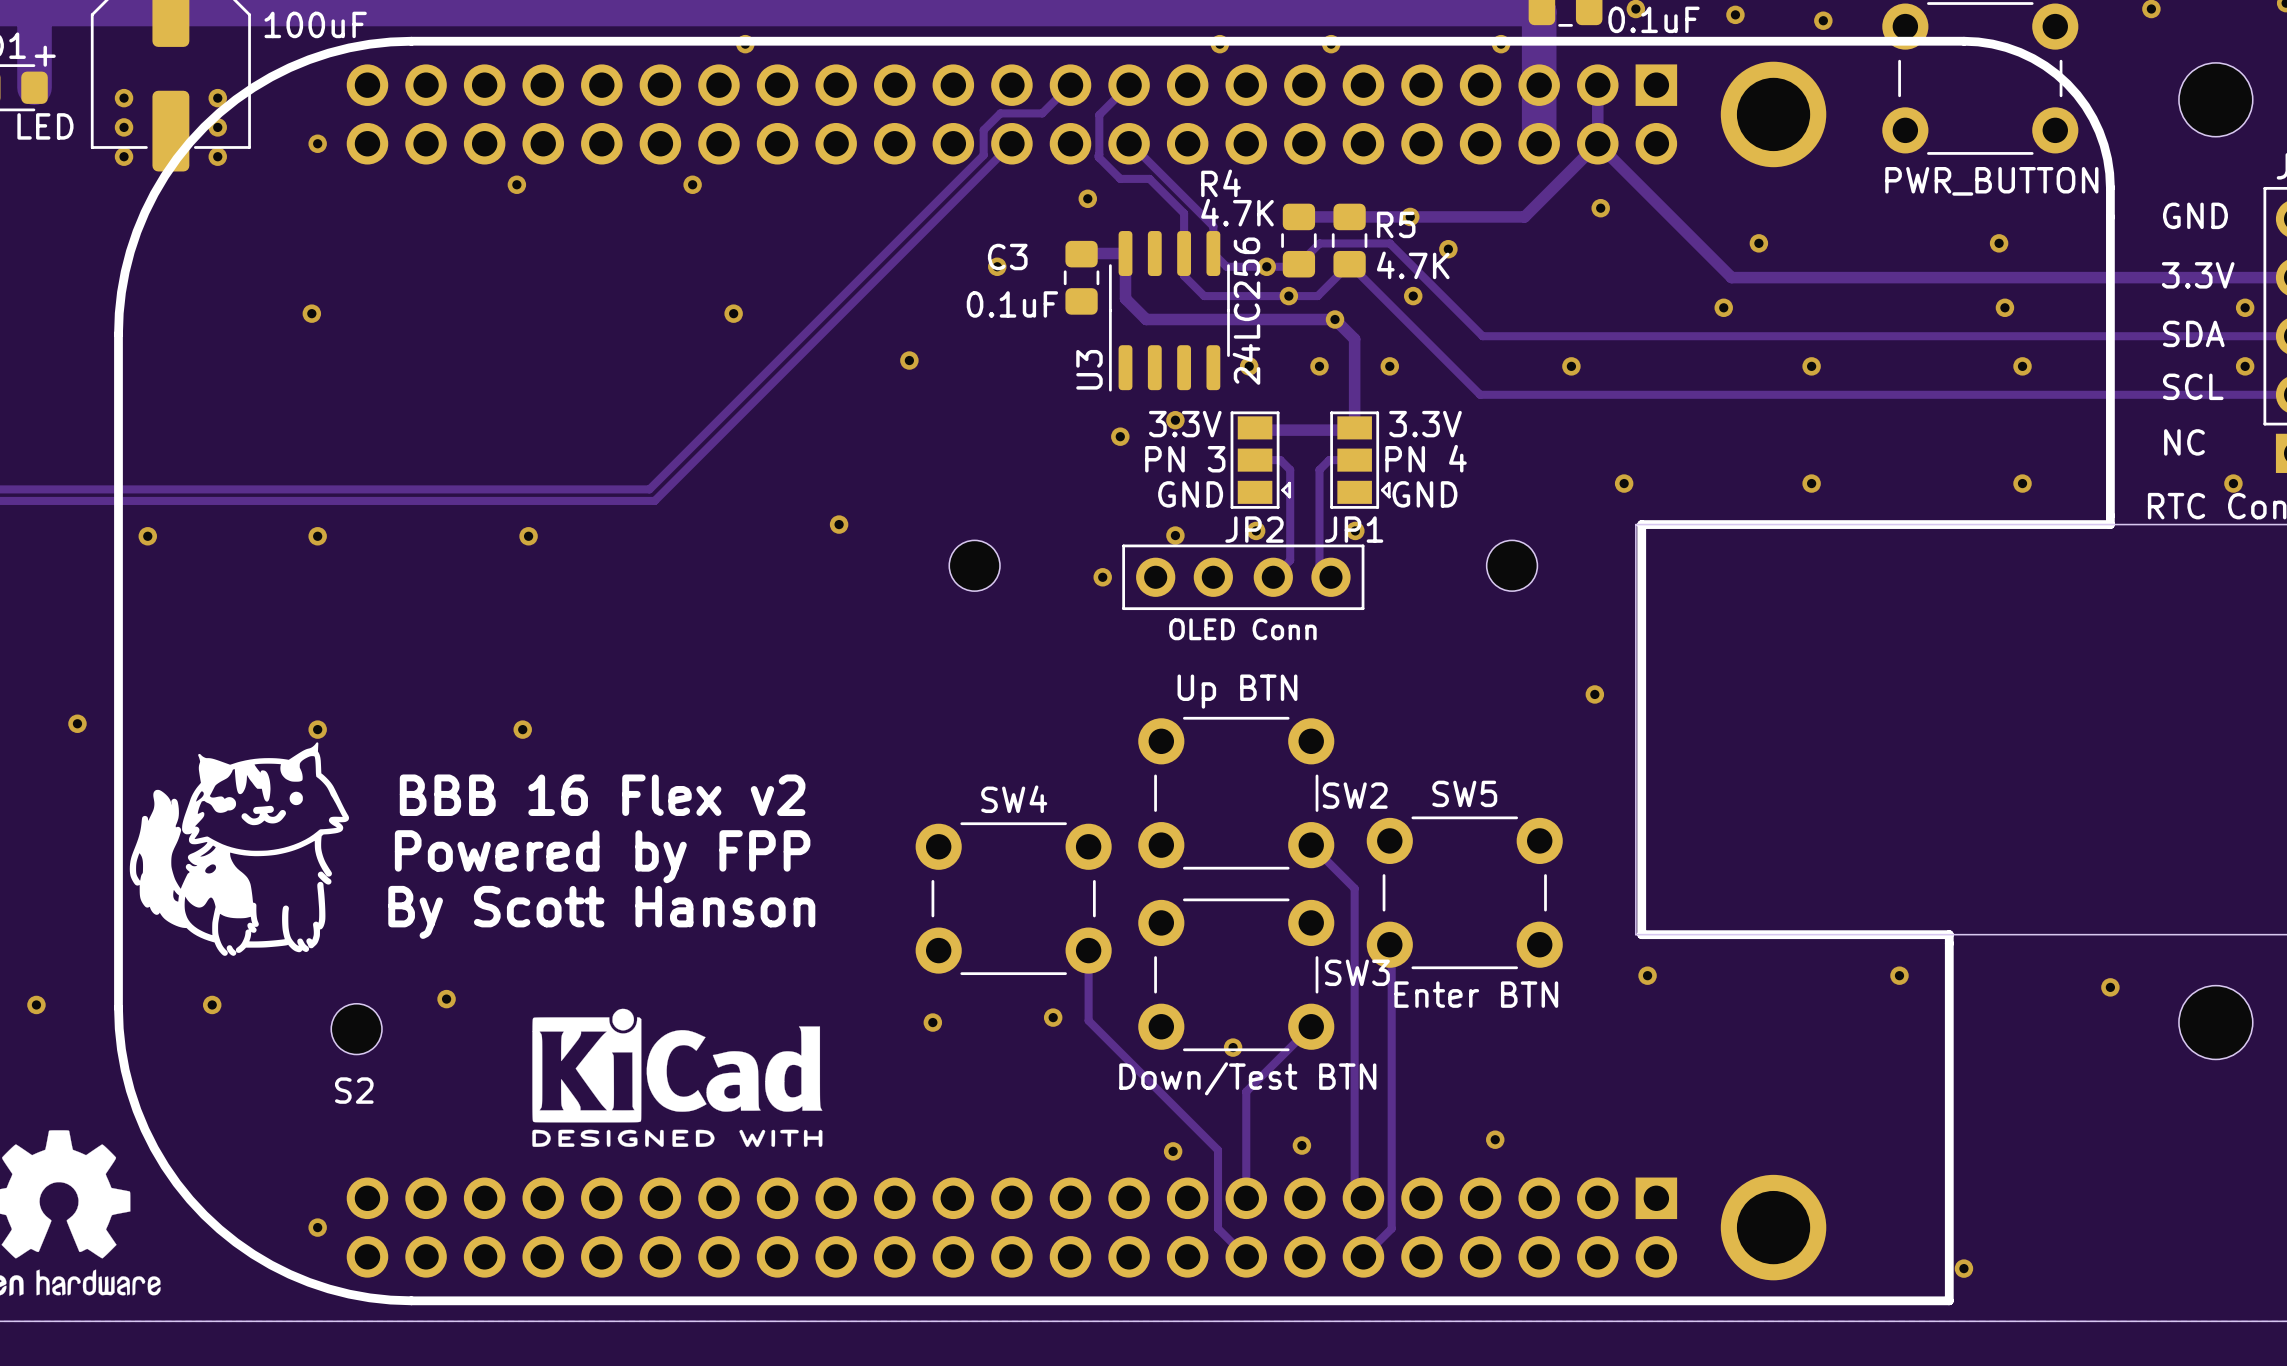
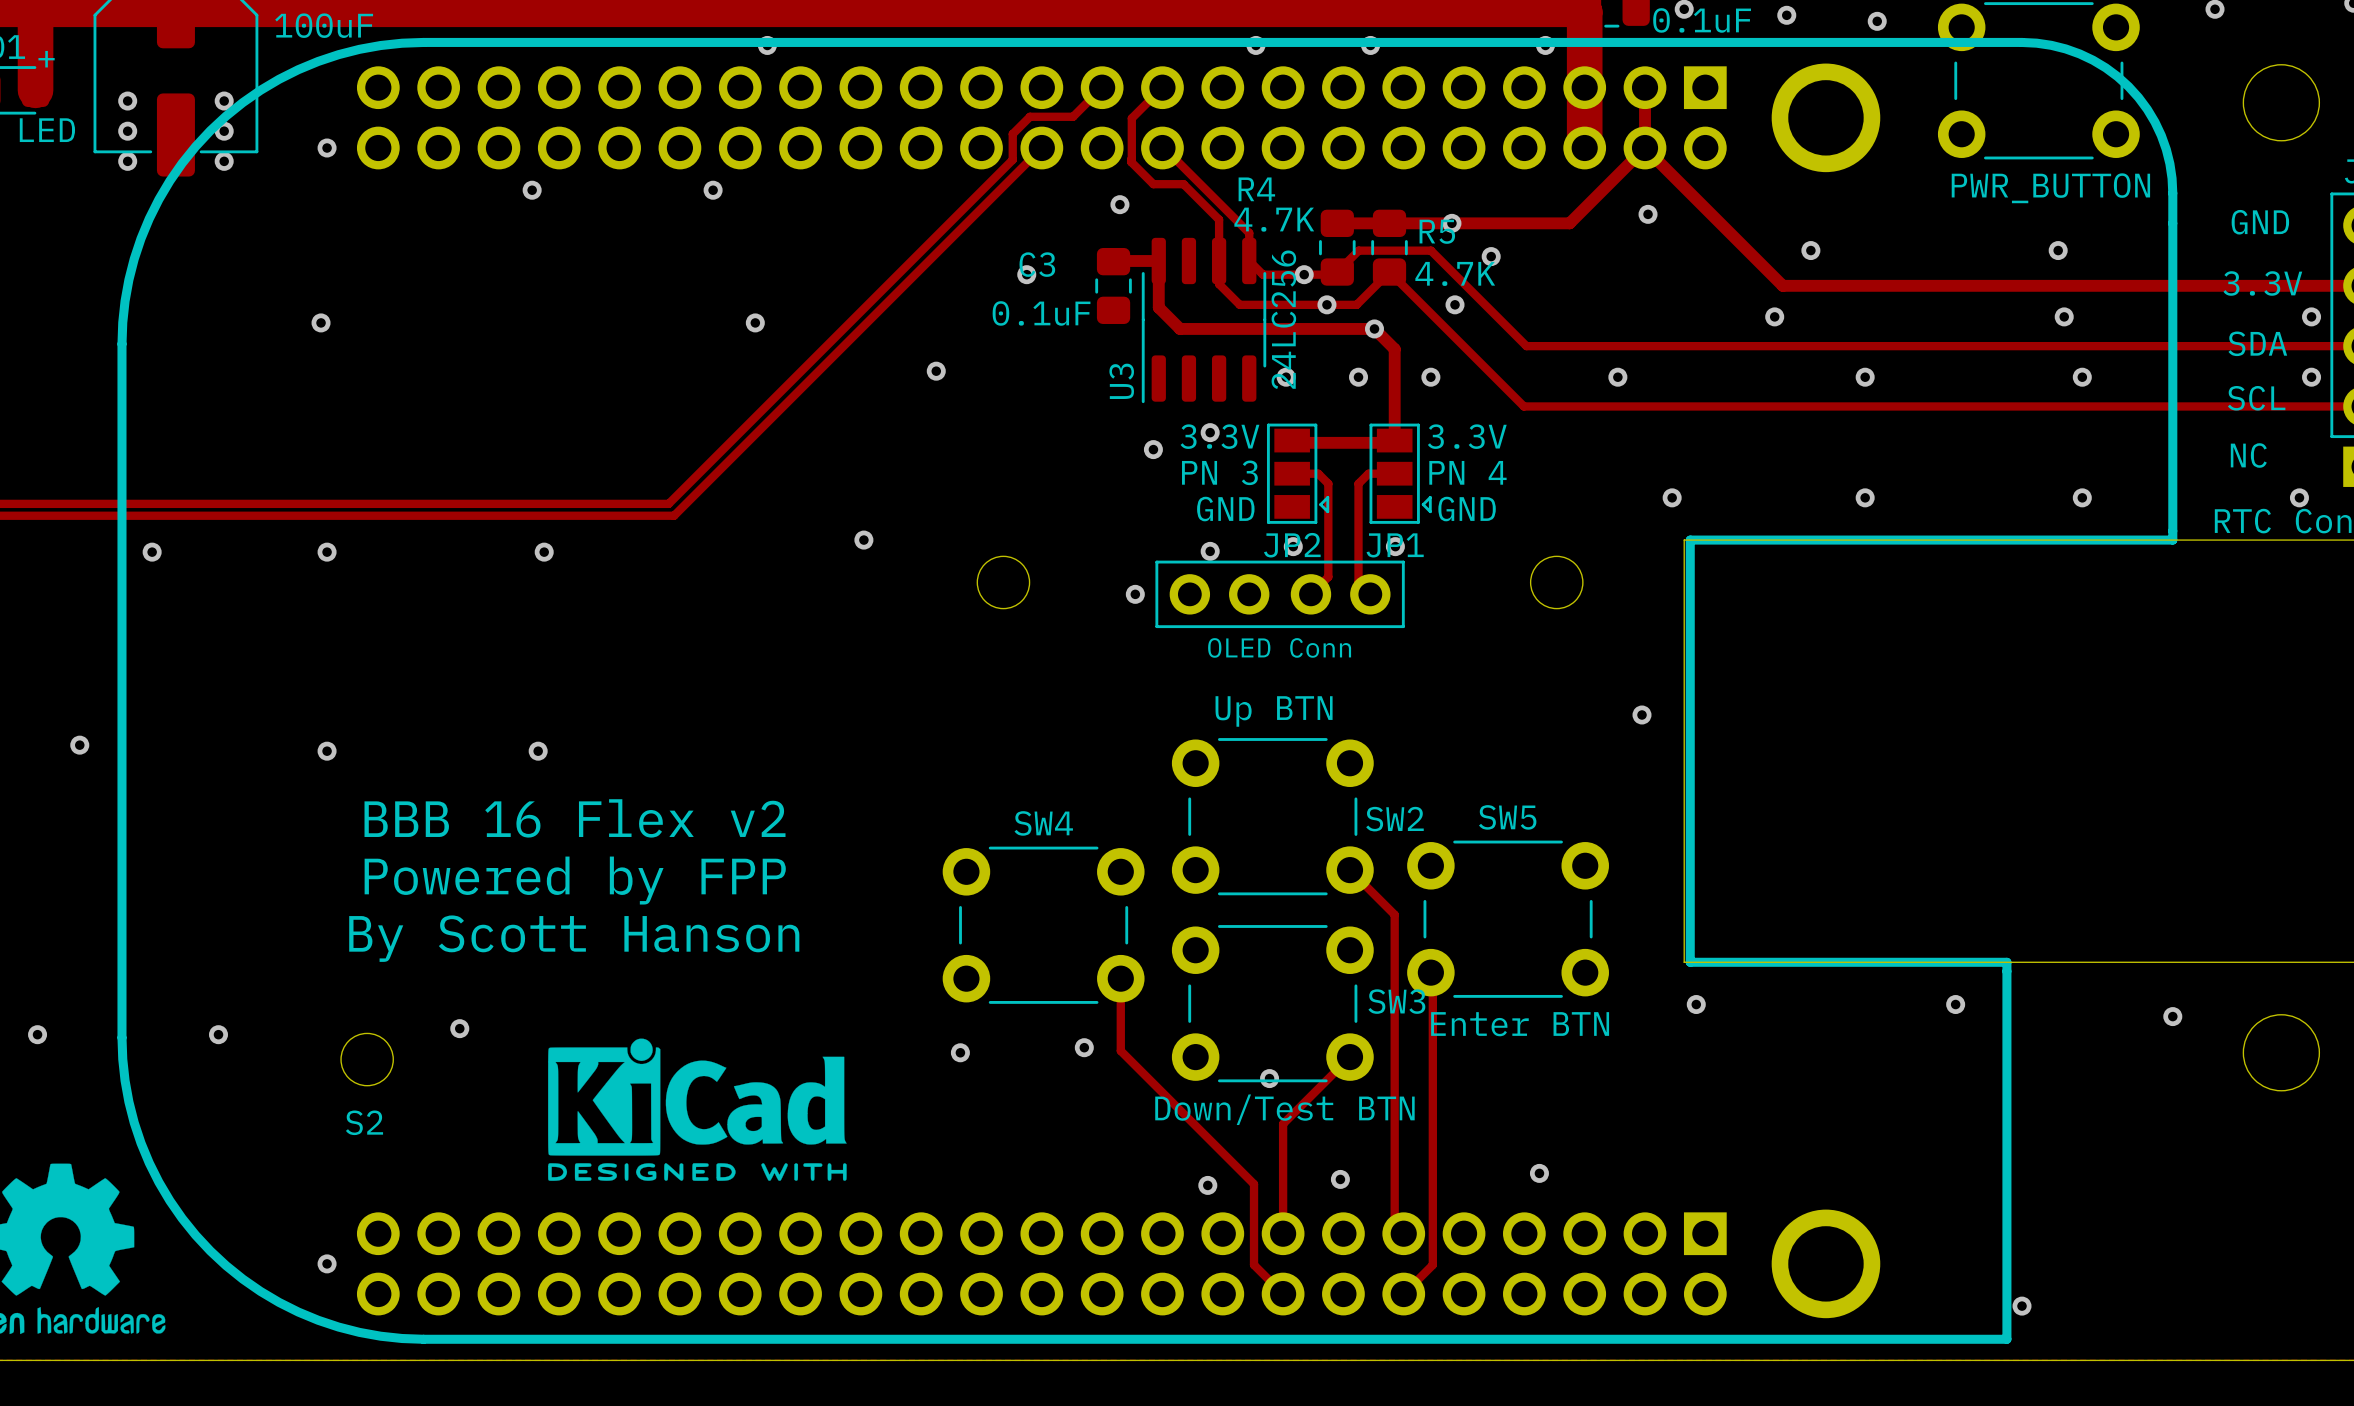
drawing: [129, 742, 350, 956] -> none
text position: BBB 16 Flex v2 (602, 795) -> BBB 16 Flex v2 (575, 818)
text position: Powered by FPP (602, 856) -> Powered by FPP (575, 880)
text position: By Scott Hanson (601, 912) -> By Scott Hanson (574, 938)

